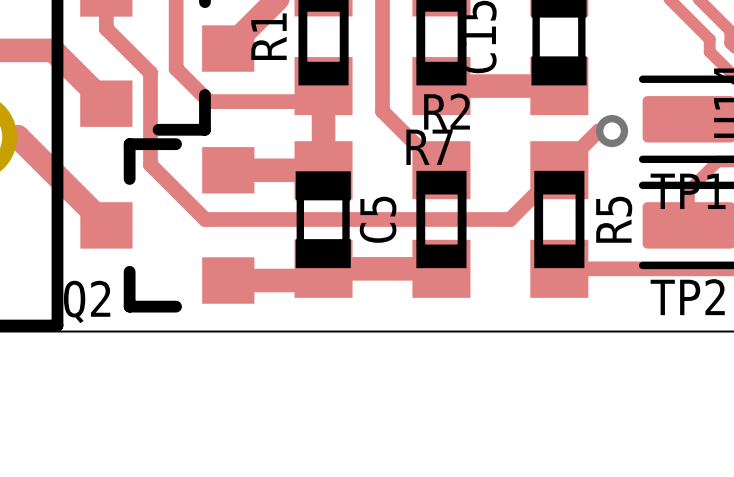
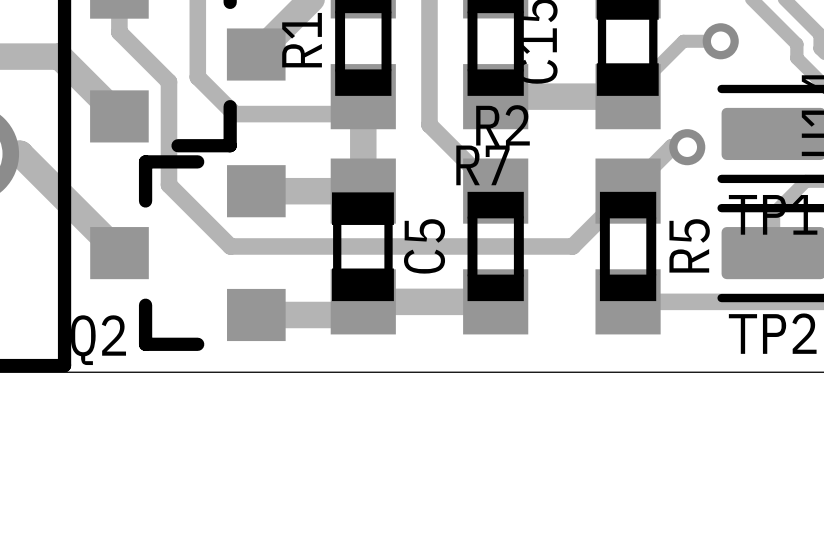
track: none -> (720, 41) (683, 41) (628, 96)
via: none -> (720, 41)

